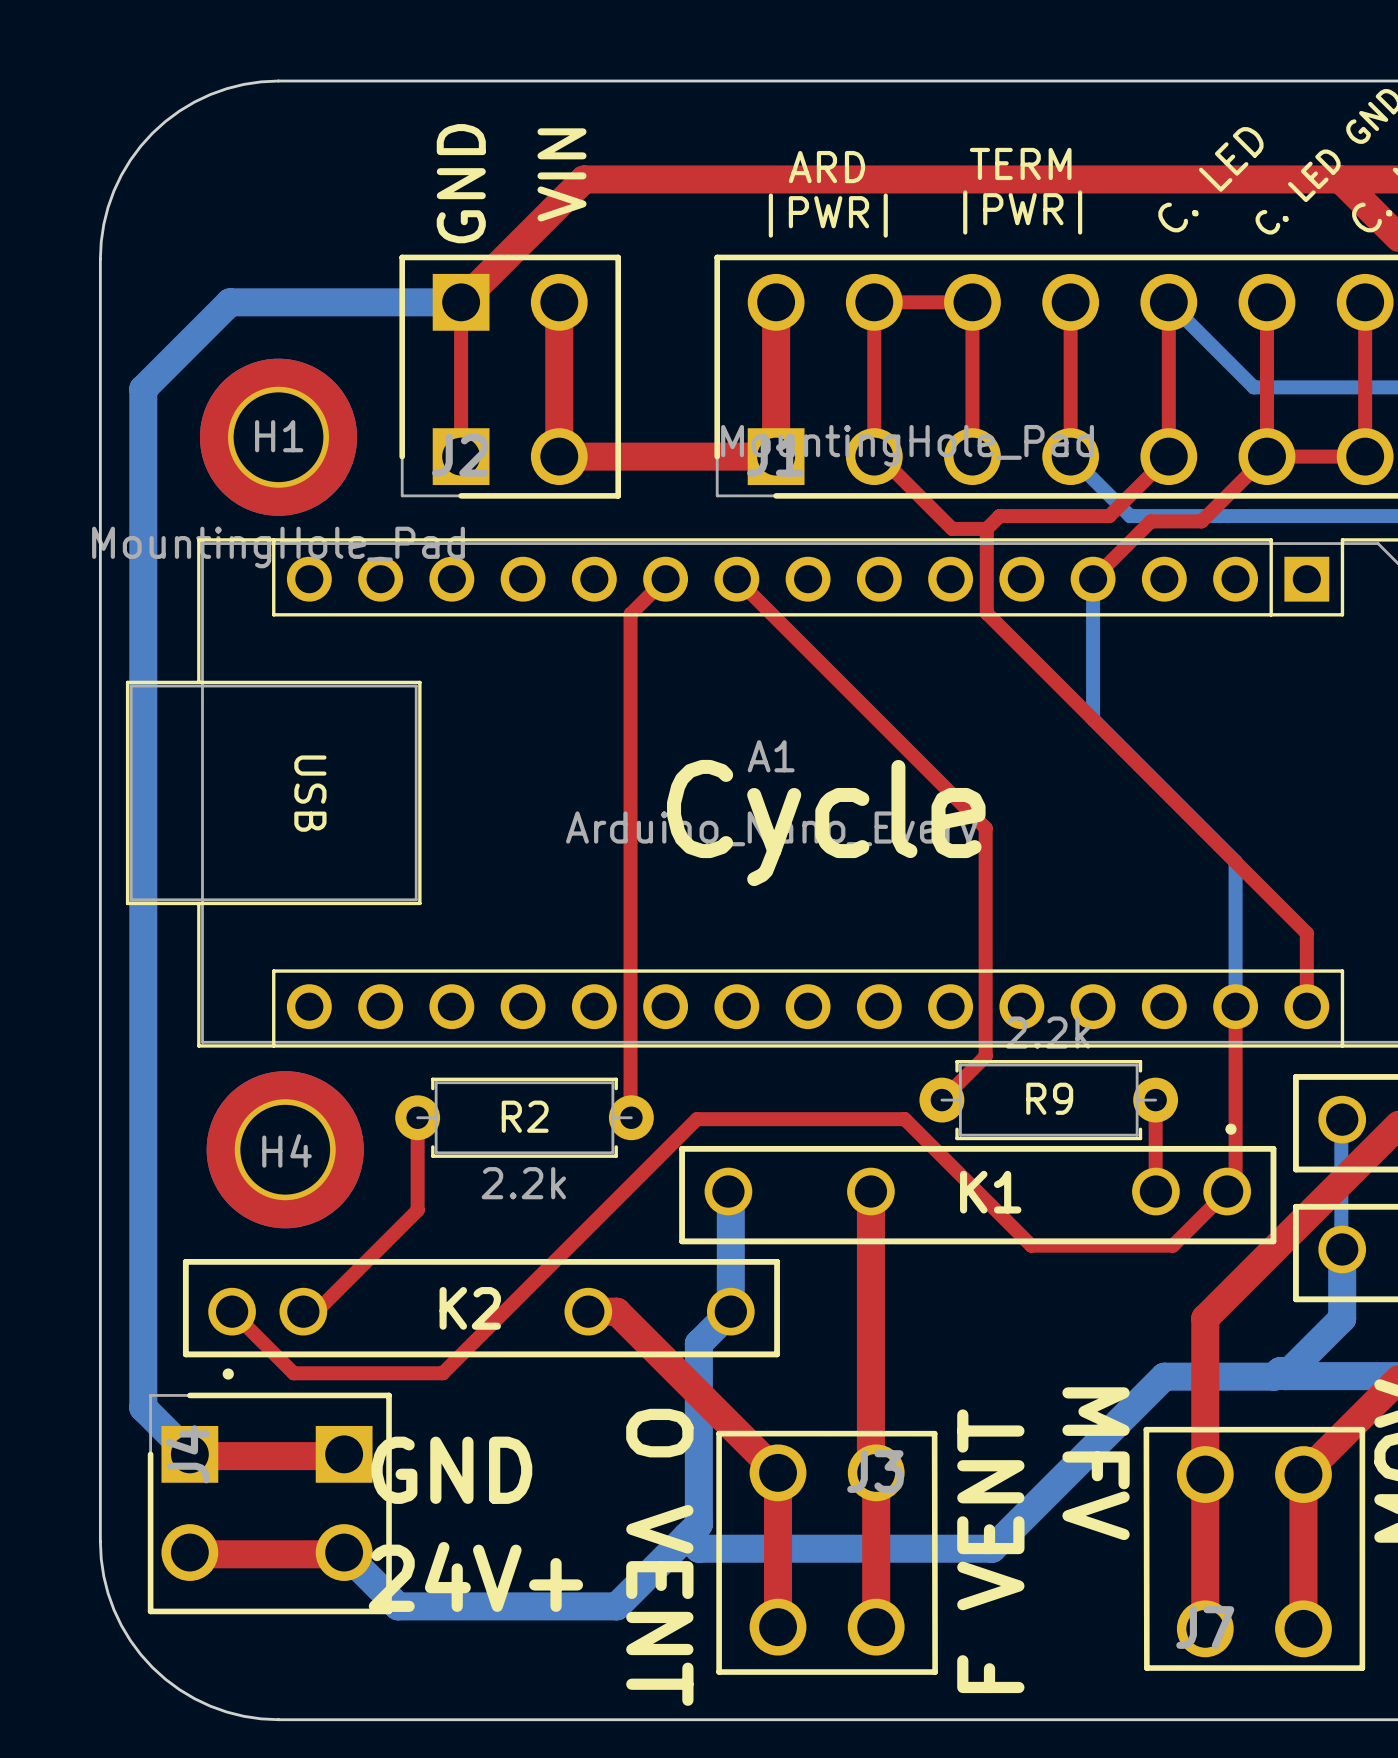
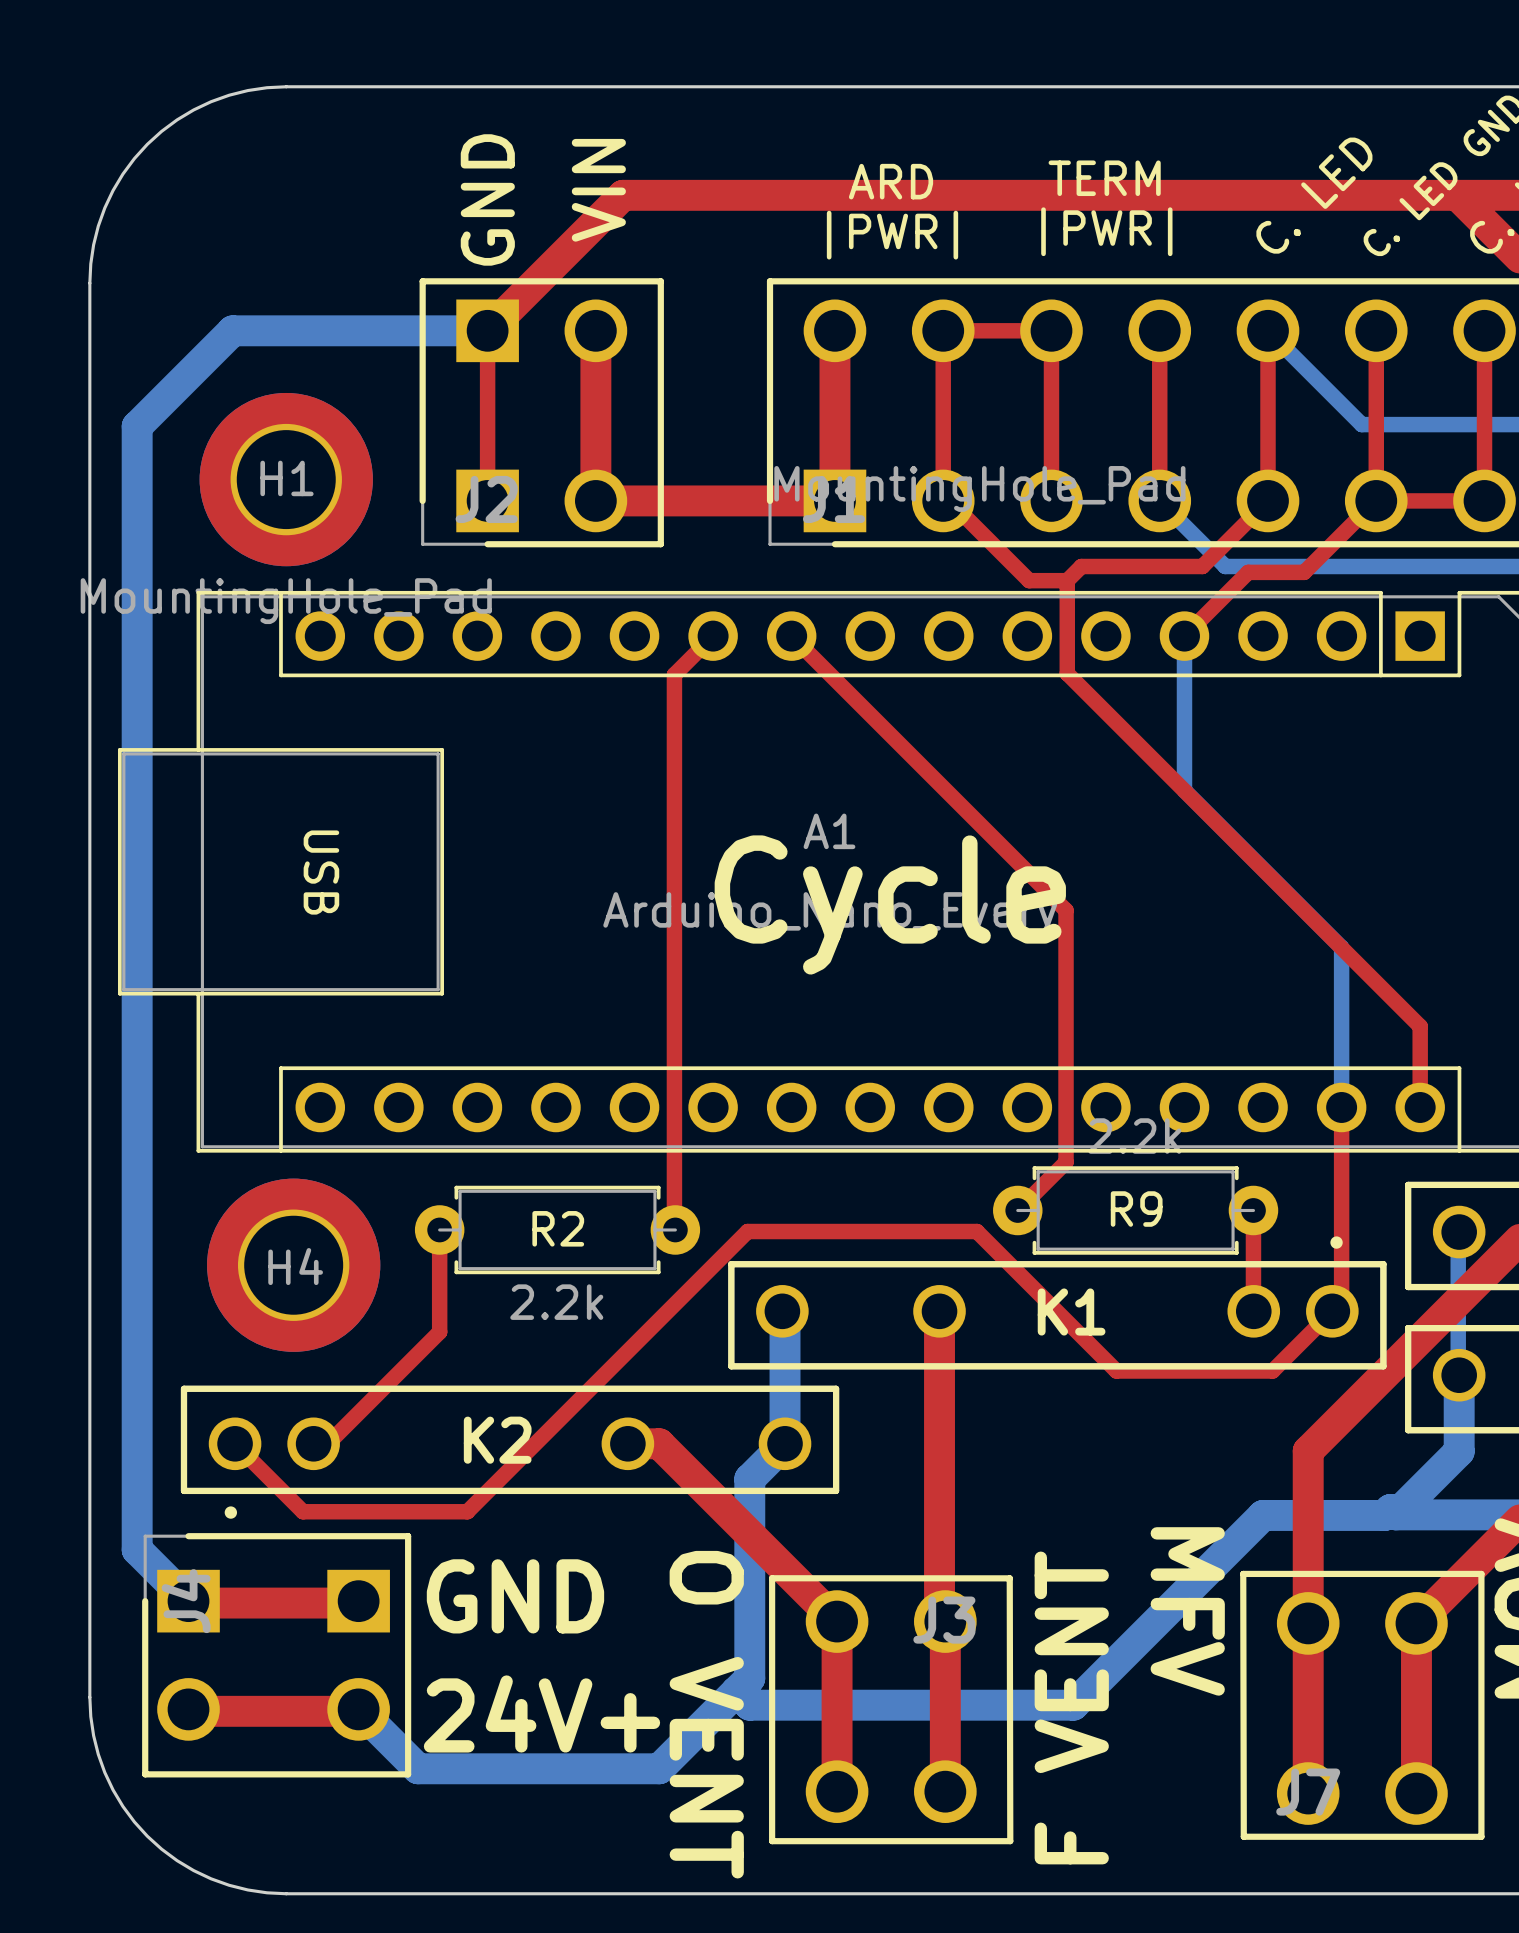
text position: GND (451, 1470) -> GND (515, 1596)
text position: 24V+ (475, 1576) -> 24V+ (541, 1713)

